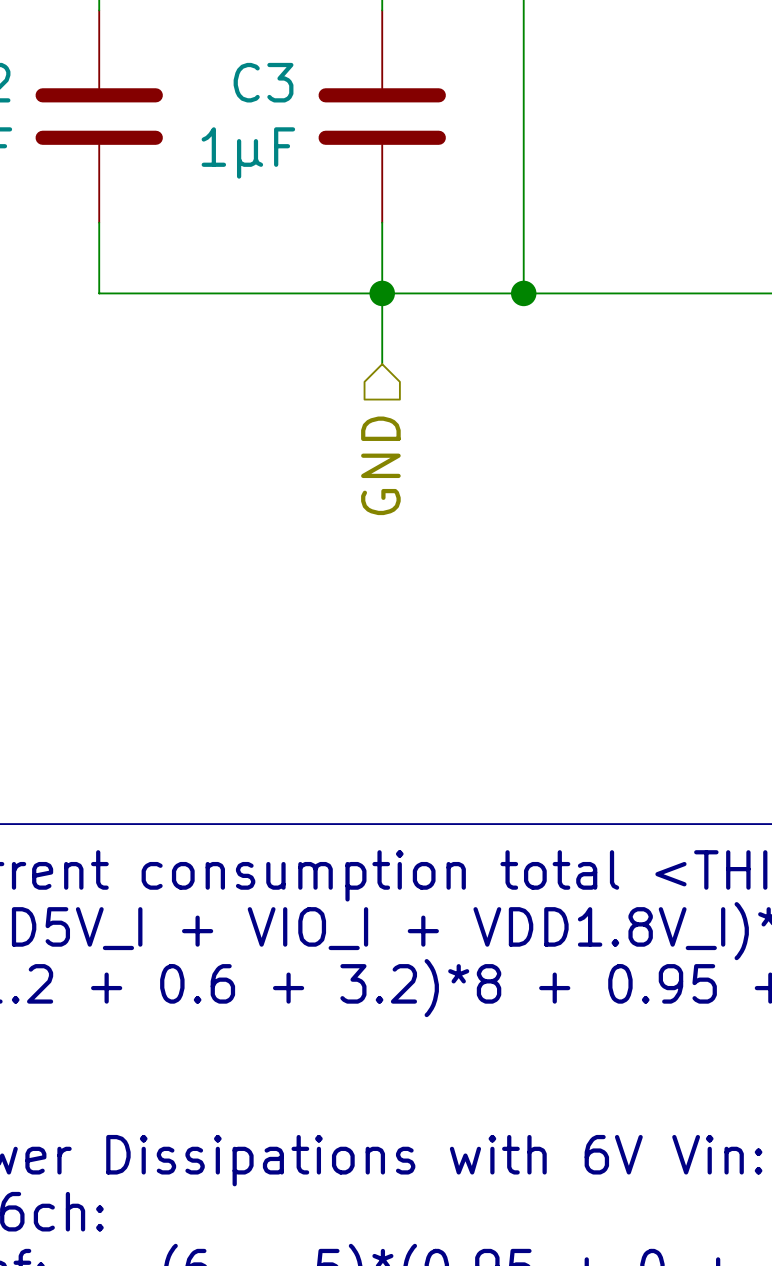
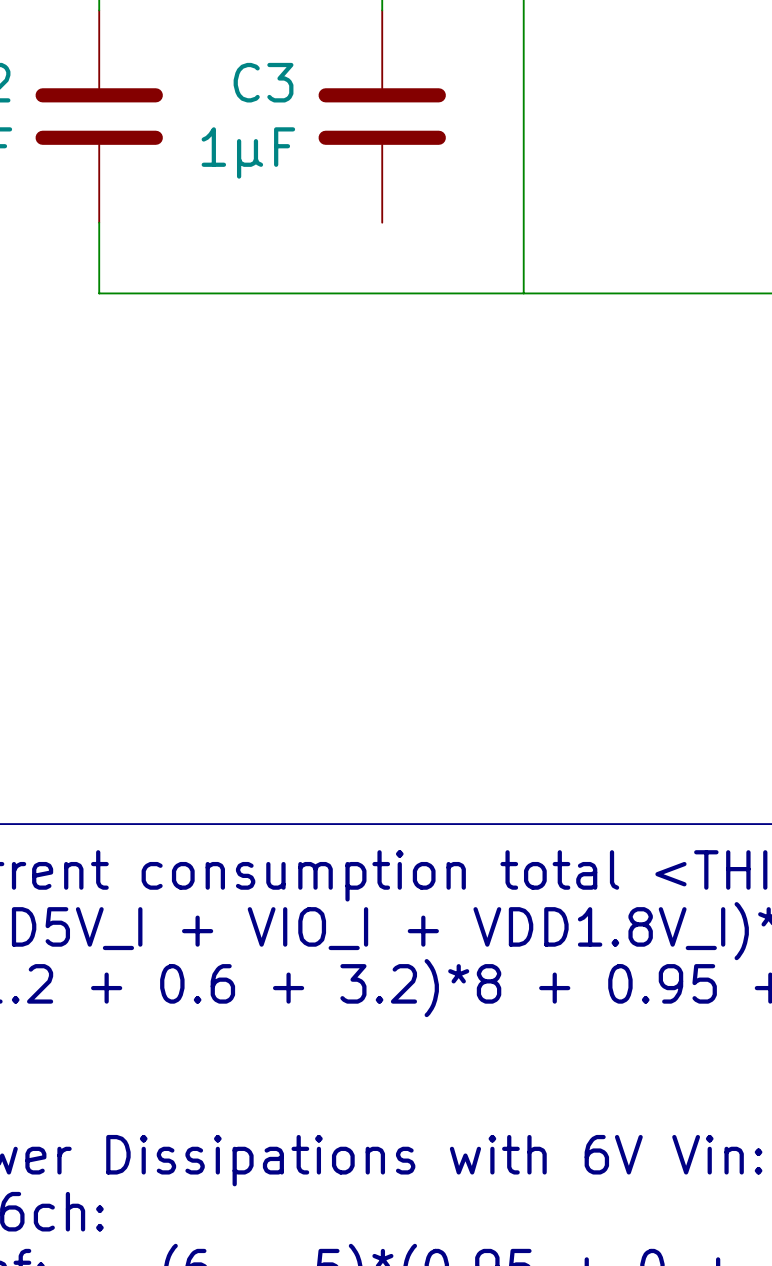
wire: (382, 222) (382, 364) -> none
junction: (382, 293) -> none
junction: (523, 293) -> none
hierarchical label: GND (380, 465) -> none

